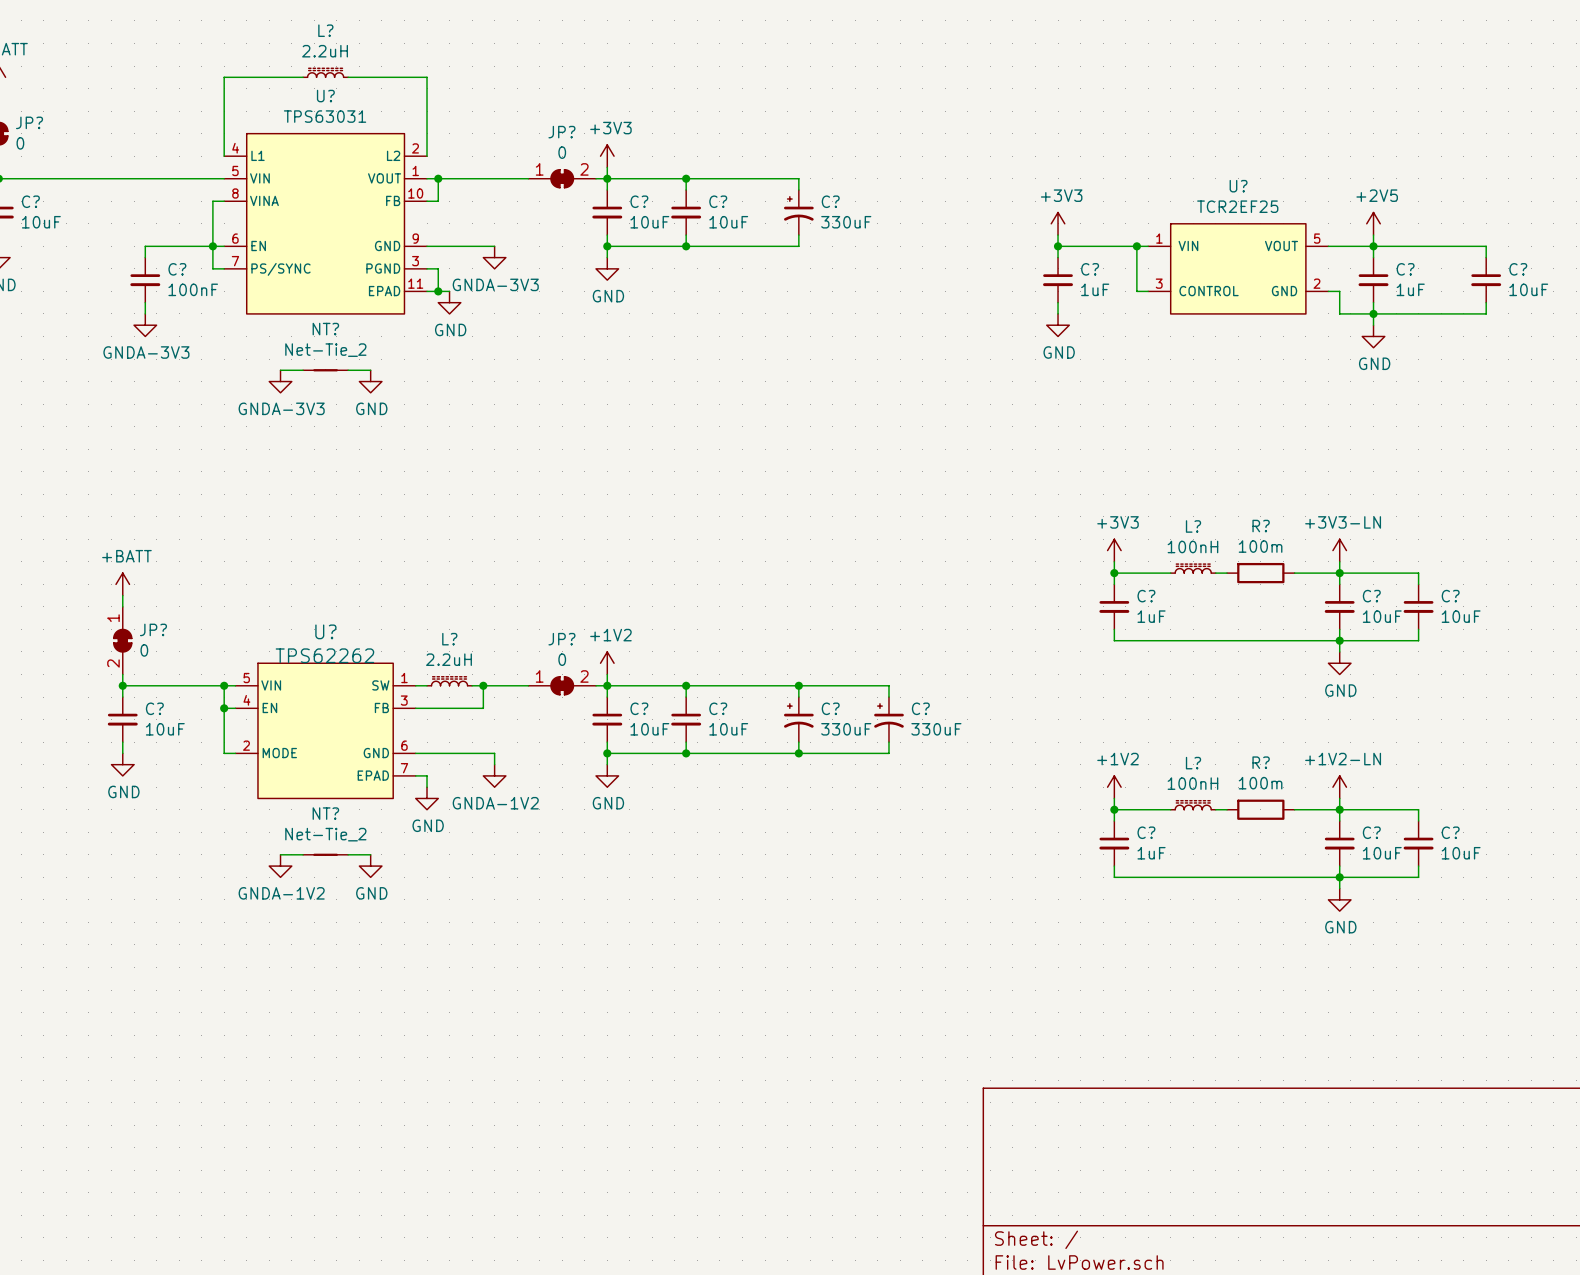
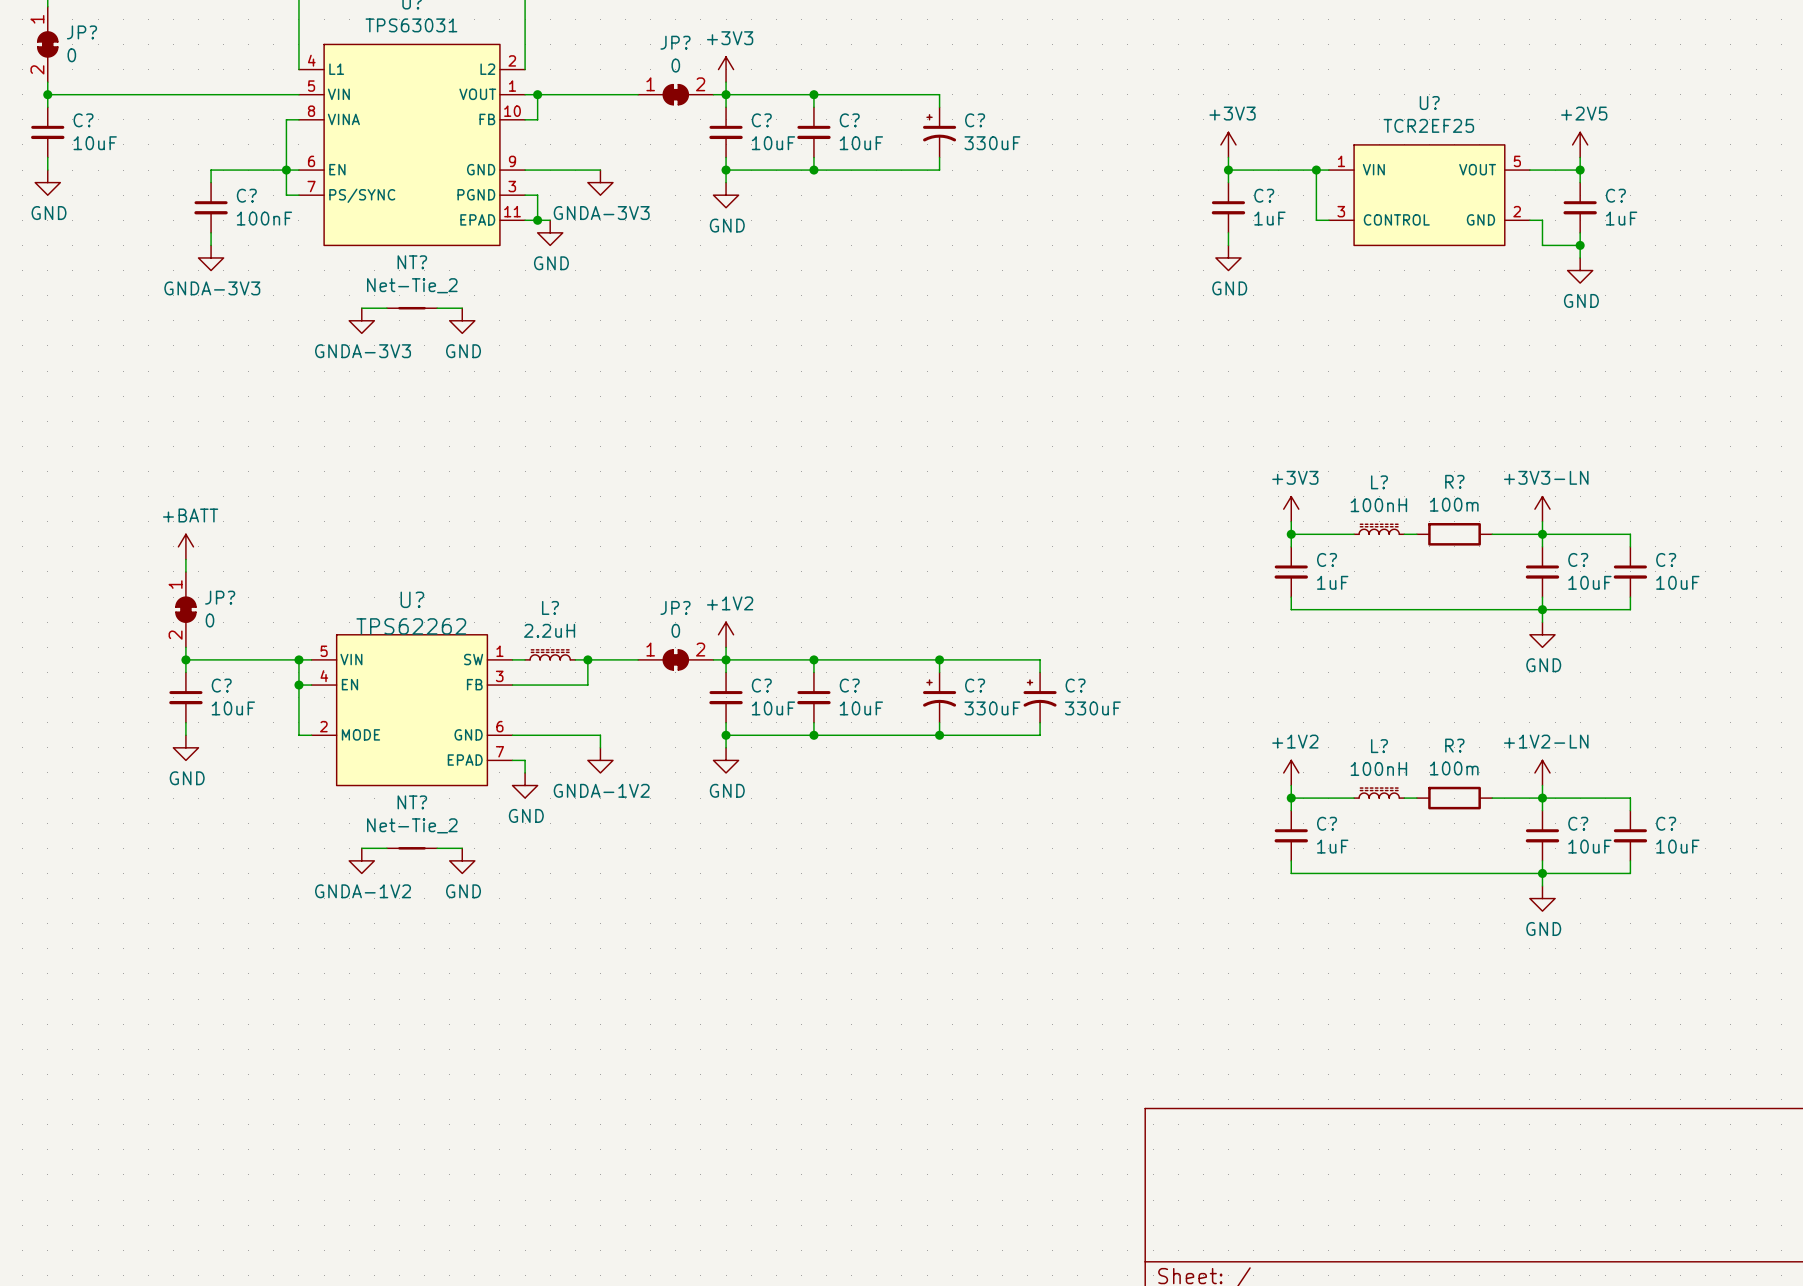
wire: (1373, 246) (1486, 246) (1486, 257) -> none
C?: 10uF (1486, 280) -> none
wire: (1486, 302) (1486, 313) (1373, 313) -> none

